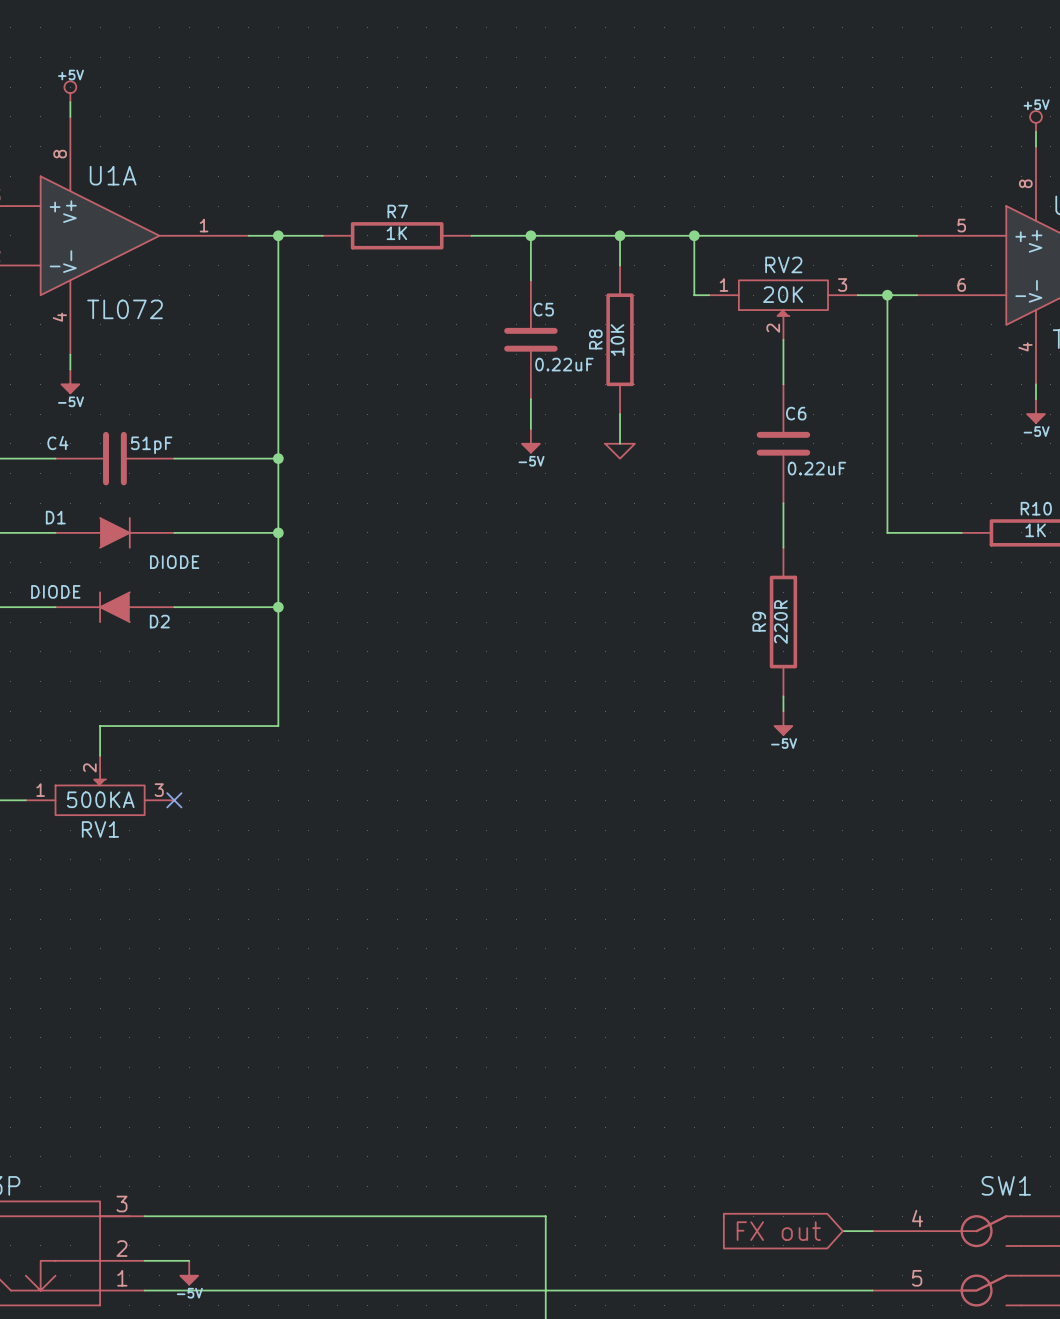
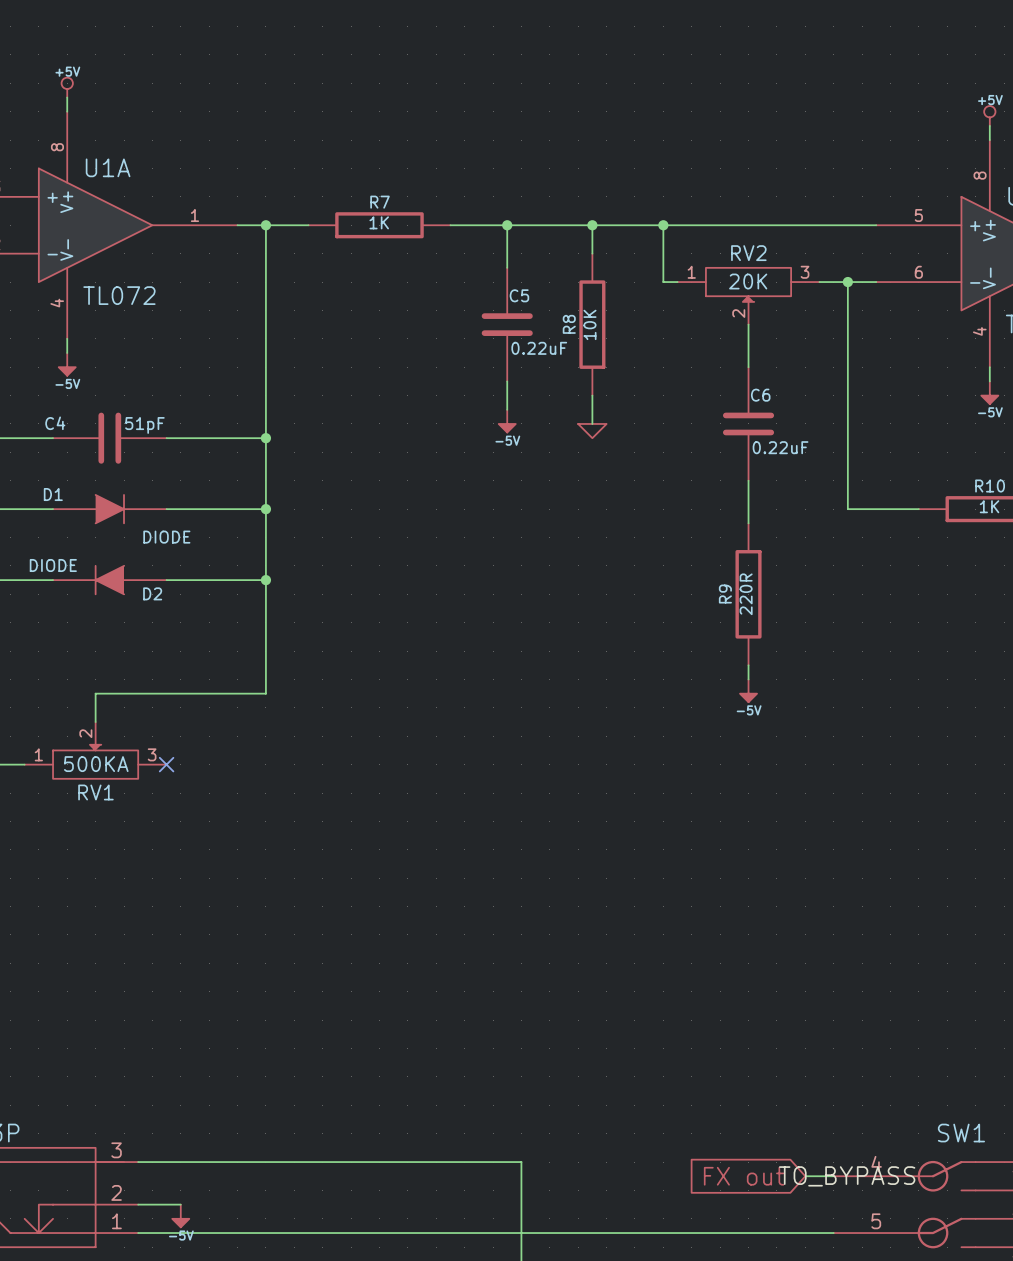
label: none -> TO_BYPASS (847, 1176)

